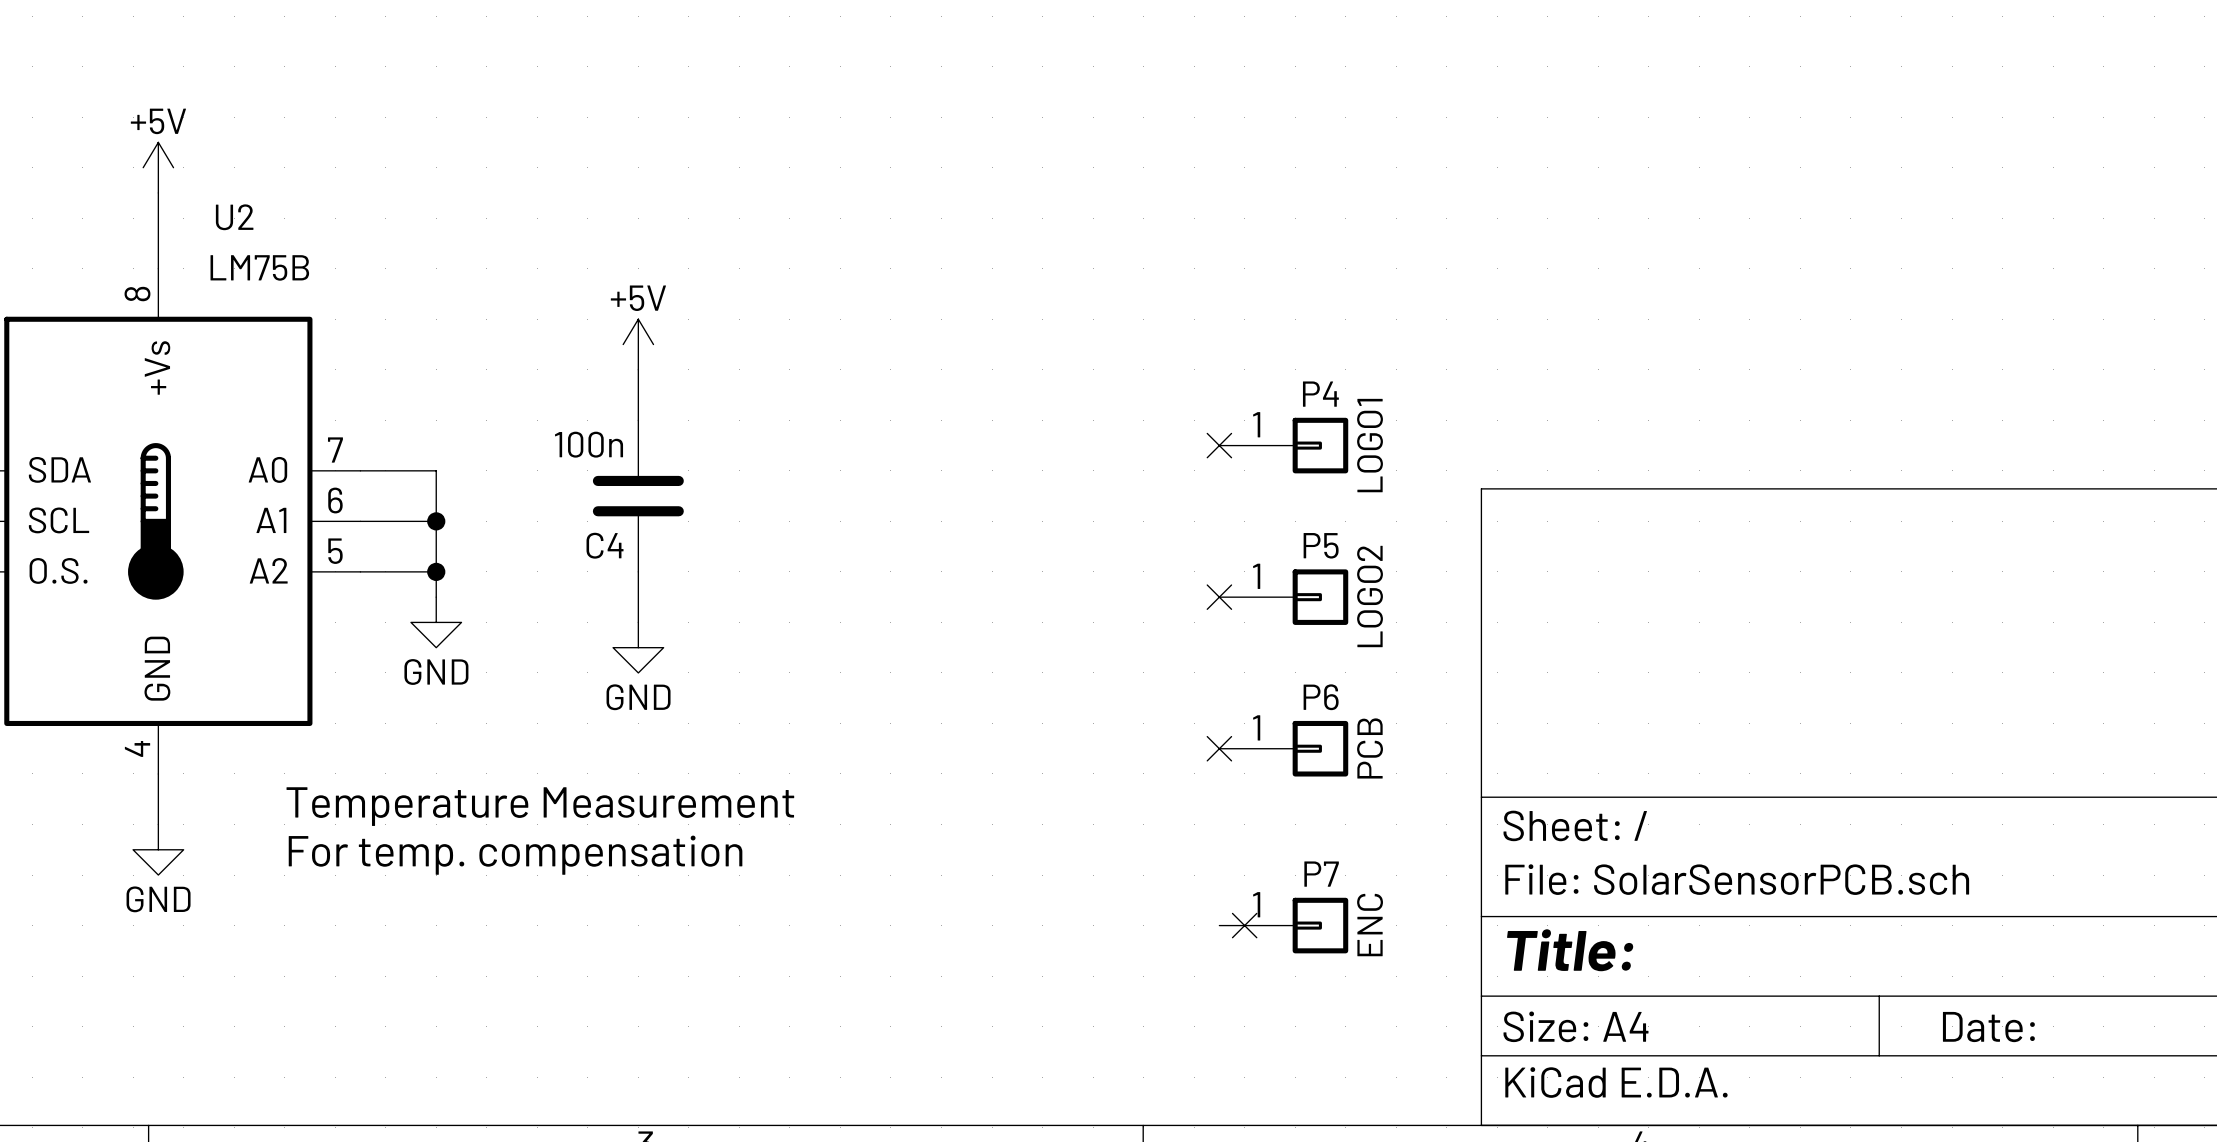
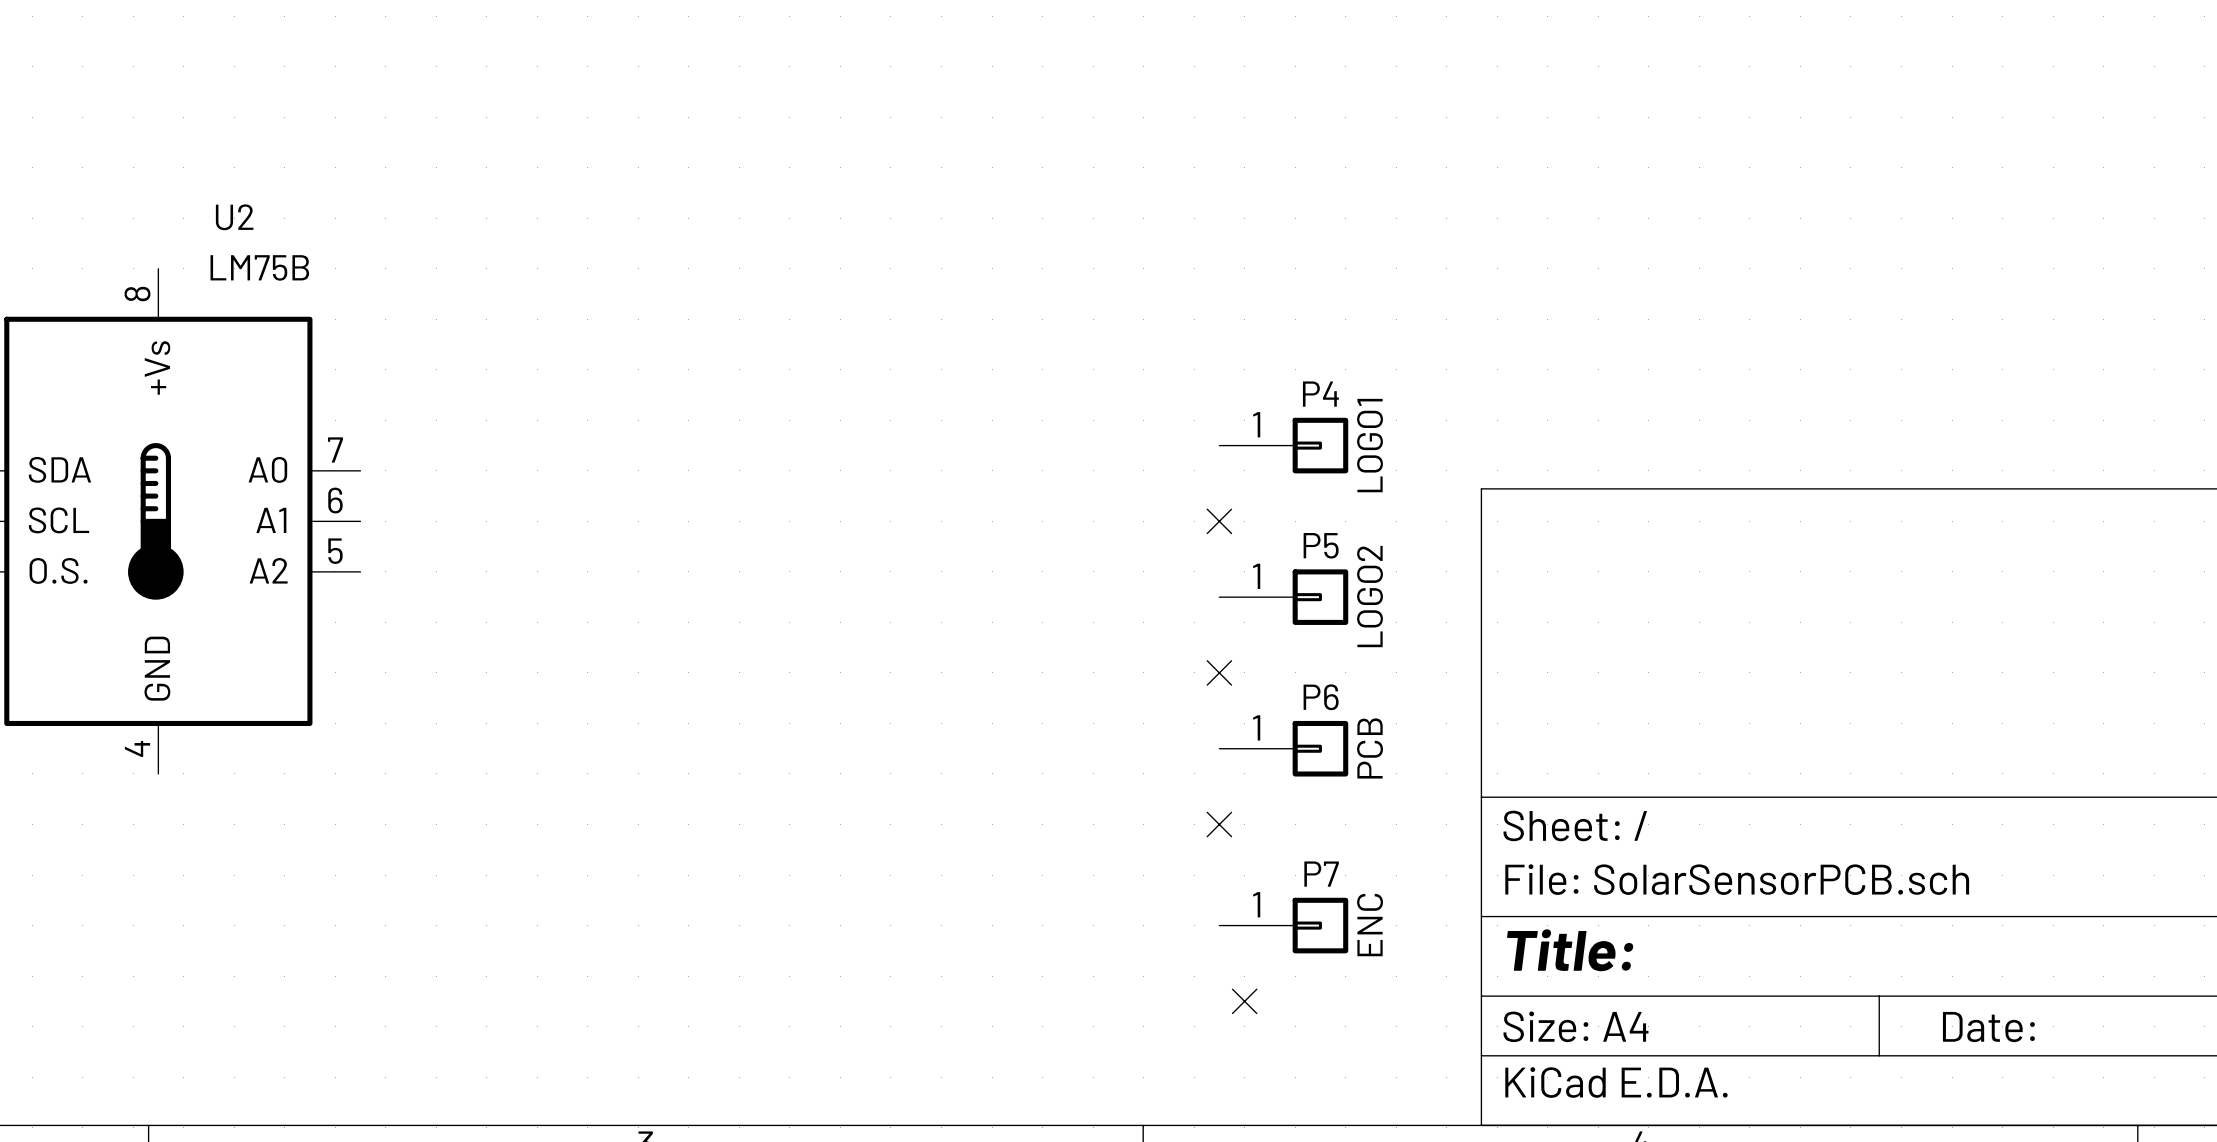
power symbol: +5V (158, 167) -> none
wire: (158, 192) (158, 268) -> none
power symbol: +5V (638, 344) -> none
wire: (638, 369) (638, 420) -> none
no-connect mark: (1219, 445) -> none
wire: (360, 470) (436, 470) (436, 597) -> none
C4: 100n (638, 496) -> none
wire: (360, 521) (436, 521) -> none
junction: (436, 521) -> none
no-connect mark: none -> (1219, 521)
wire: (360, 571) (436, 571) -> none
junction: (436, 571) -> none
wire: (638, 571) (638, 622) -> none
no-connect mark: (1219, 597) -> none
power symbol: GND (436, 622) -> none
power symbol: GND (638, 647) -> none
no-connect mark: none -> (1219, 672)
no-connect mark: (1219, 748) -> none
wire: (158, 773) (158, 824) -> none
text: Temperature Measurement (540, 806) -> none
no-connect mark: none -> (1219, 824)
power symbol: GND (158, 849) -> none
text: For temp. compensation (515, 855) -> none
no-connect mark: (1244, 925) -> none
no-connect mark: none -> (1244, 1001)

